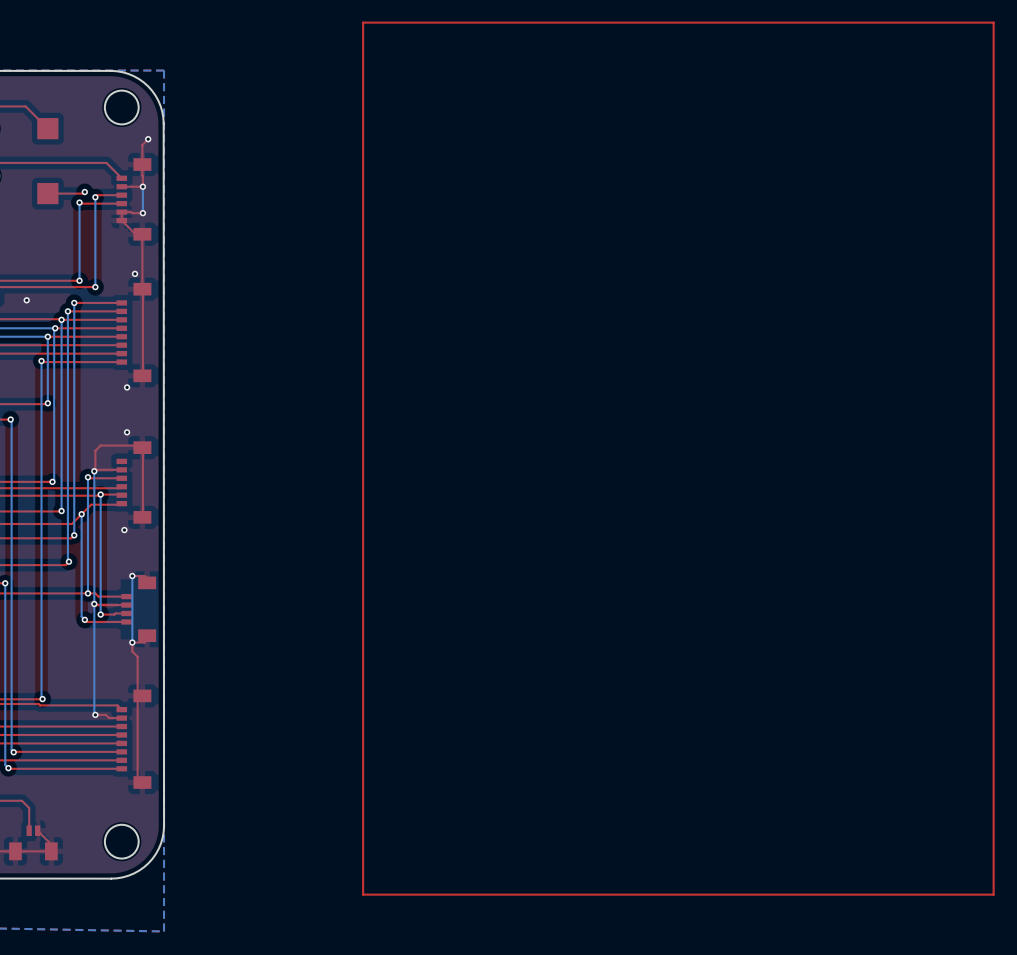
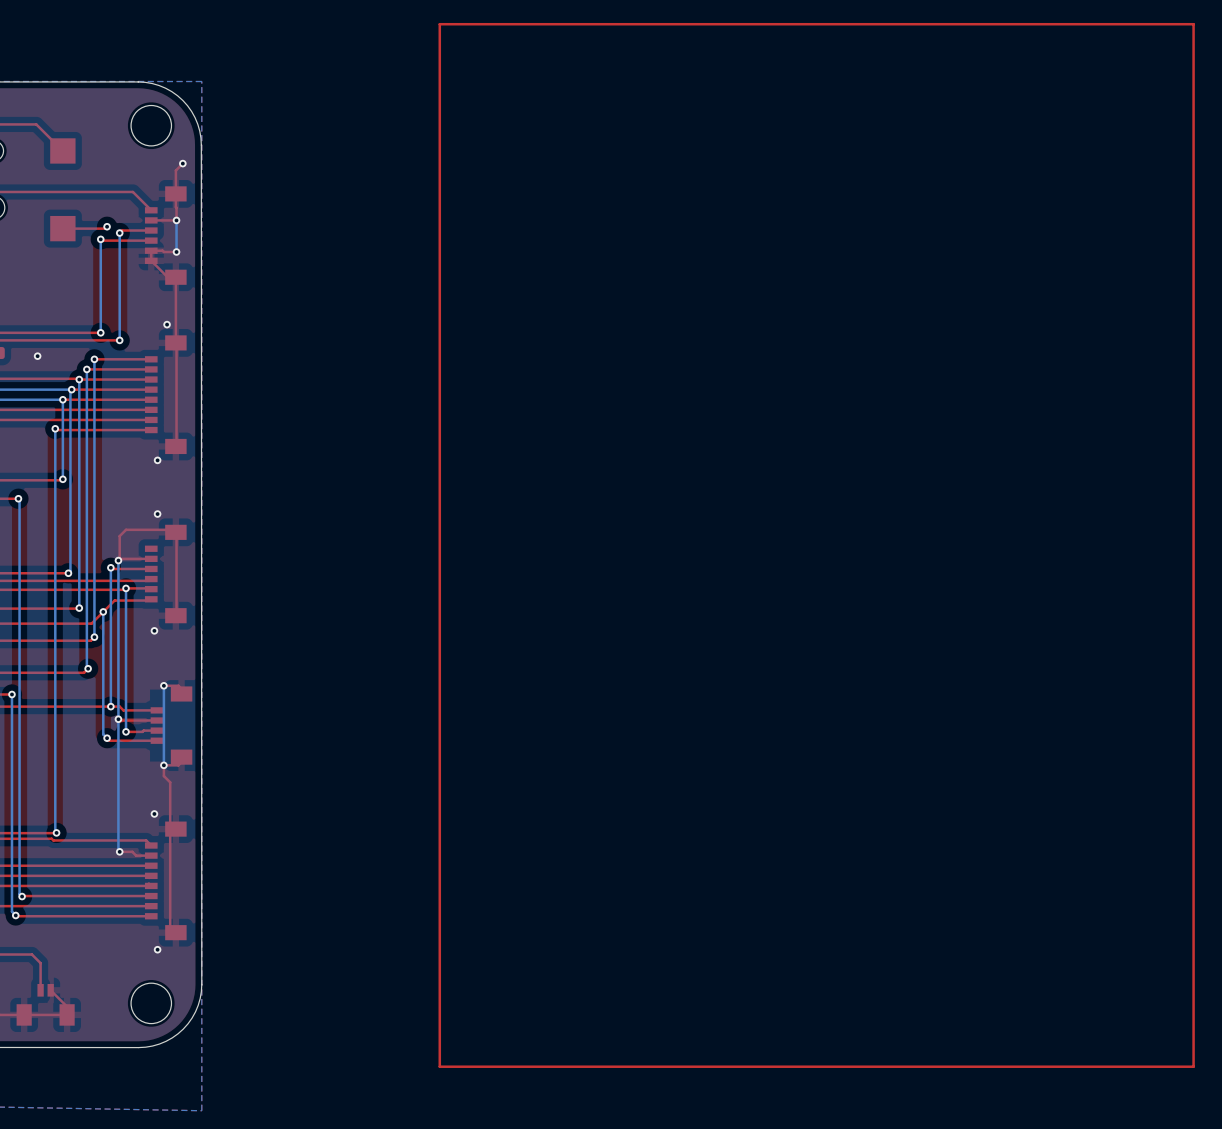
via: none -> (154, 813)
via: none -> (157, 949)

